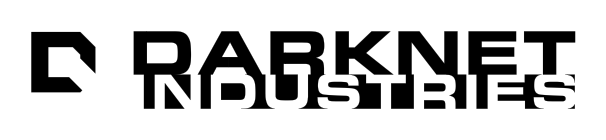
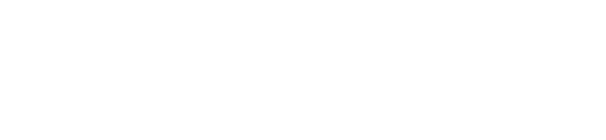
drawing: [31, 31, 576, 109] -> none

